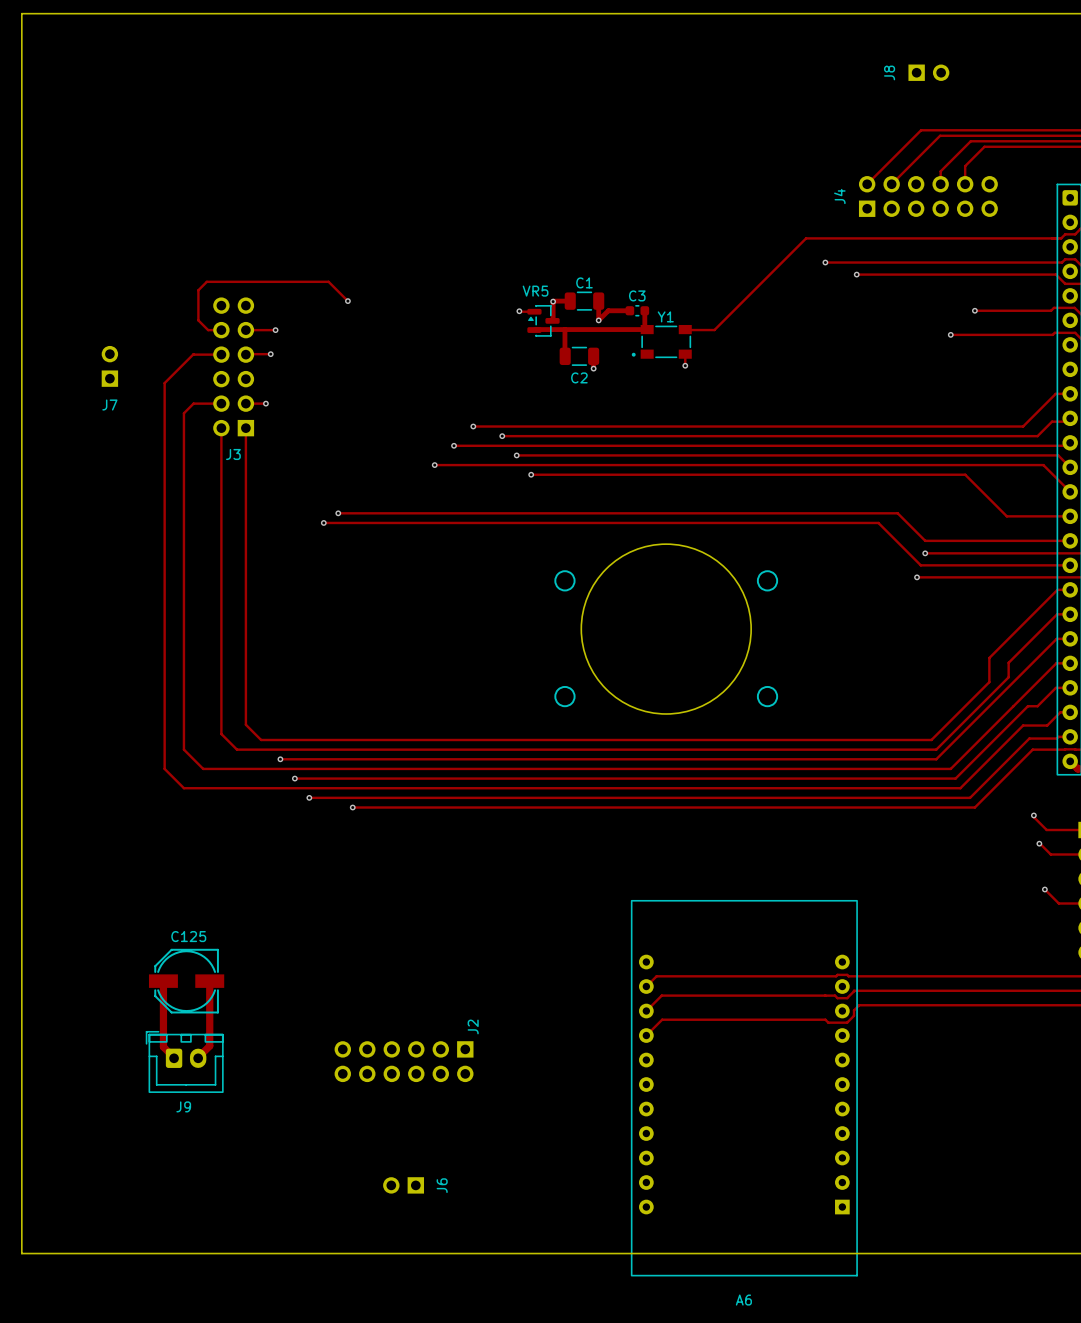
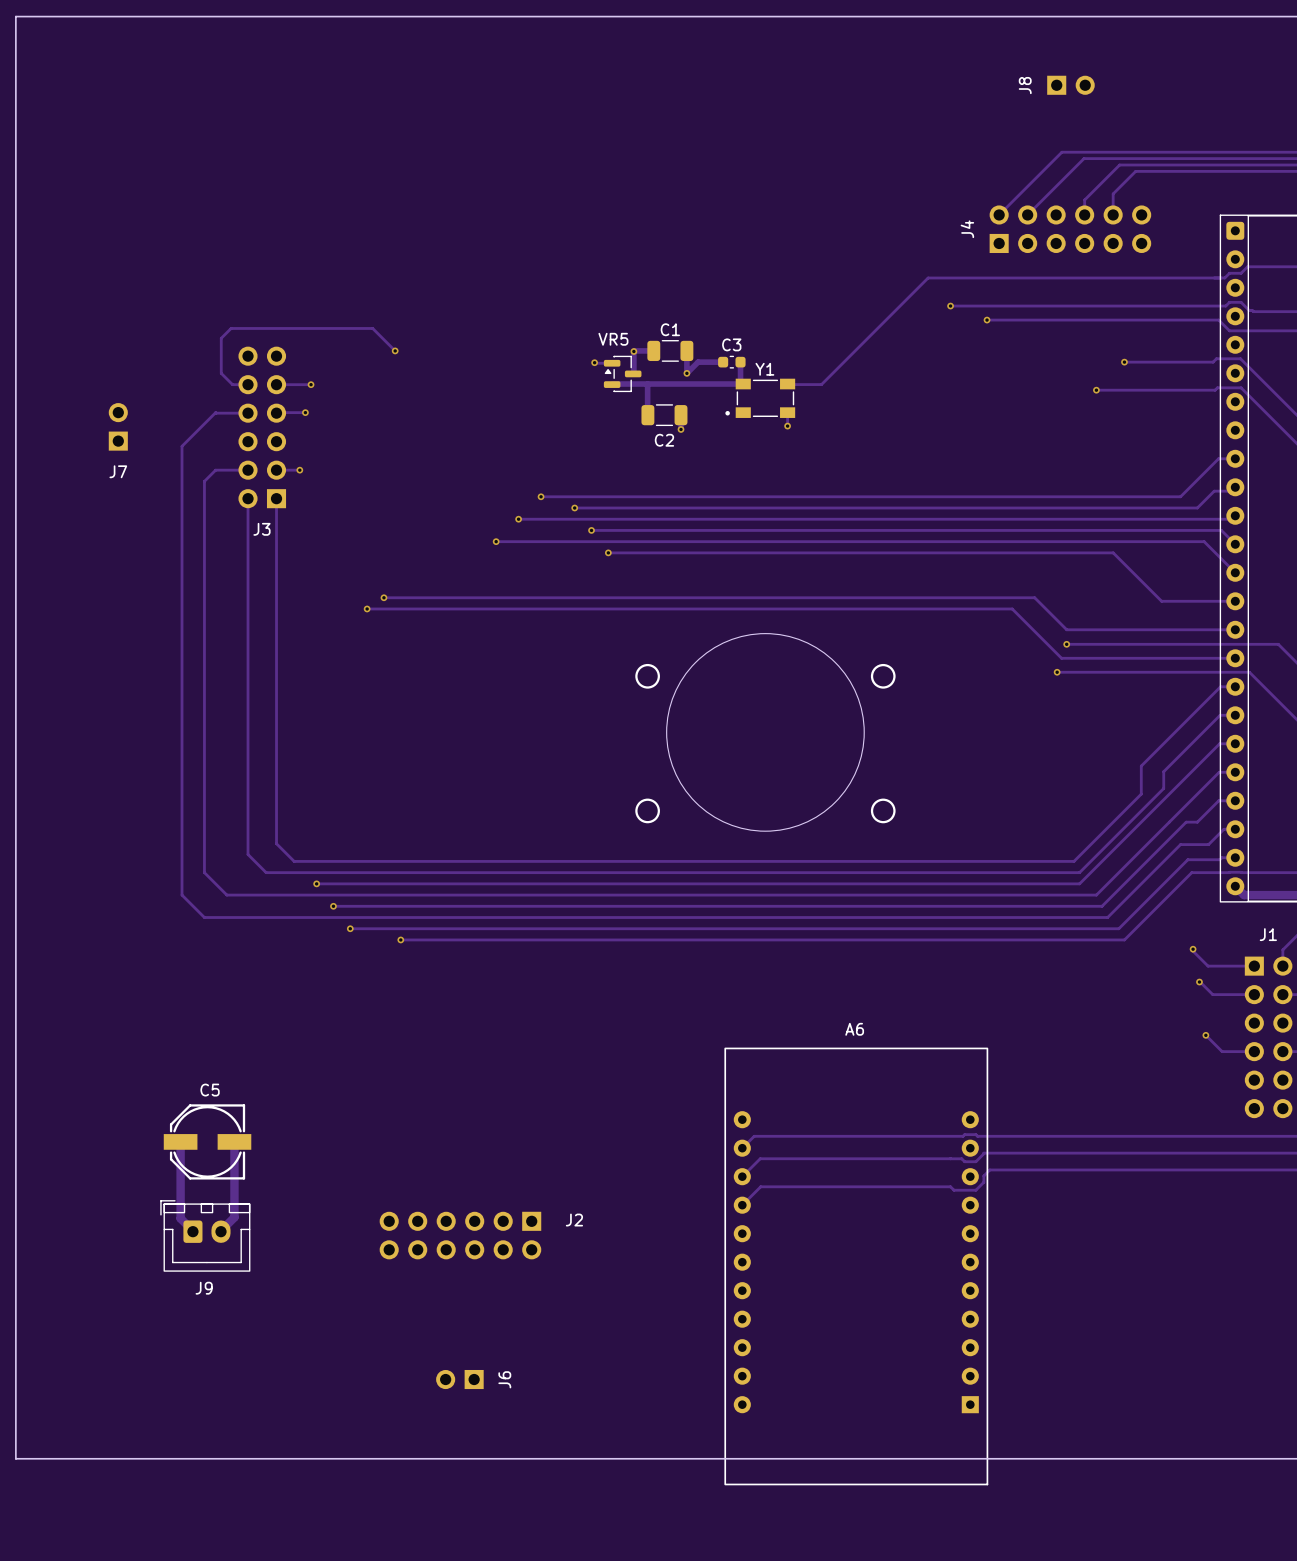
C125 name: C125 (188, 936) -> C5 (210, 1090)
J2 name rotation: 0° (473, 1026) -> 90° clockwise (574, 1220)
J2 name position: J2 (473, 1026) -> J2 (574, 1220)
A6 name position: A6 (743, 1300) -> A6 (854, 1029)

